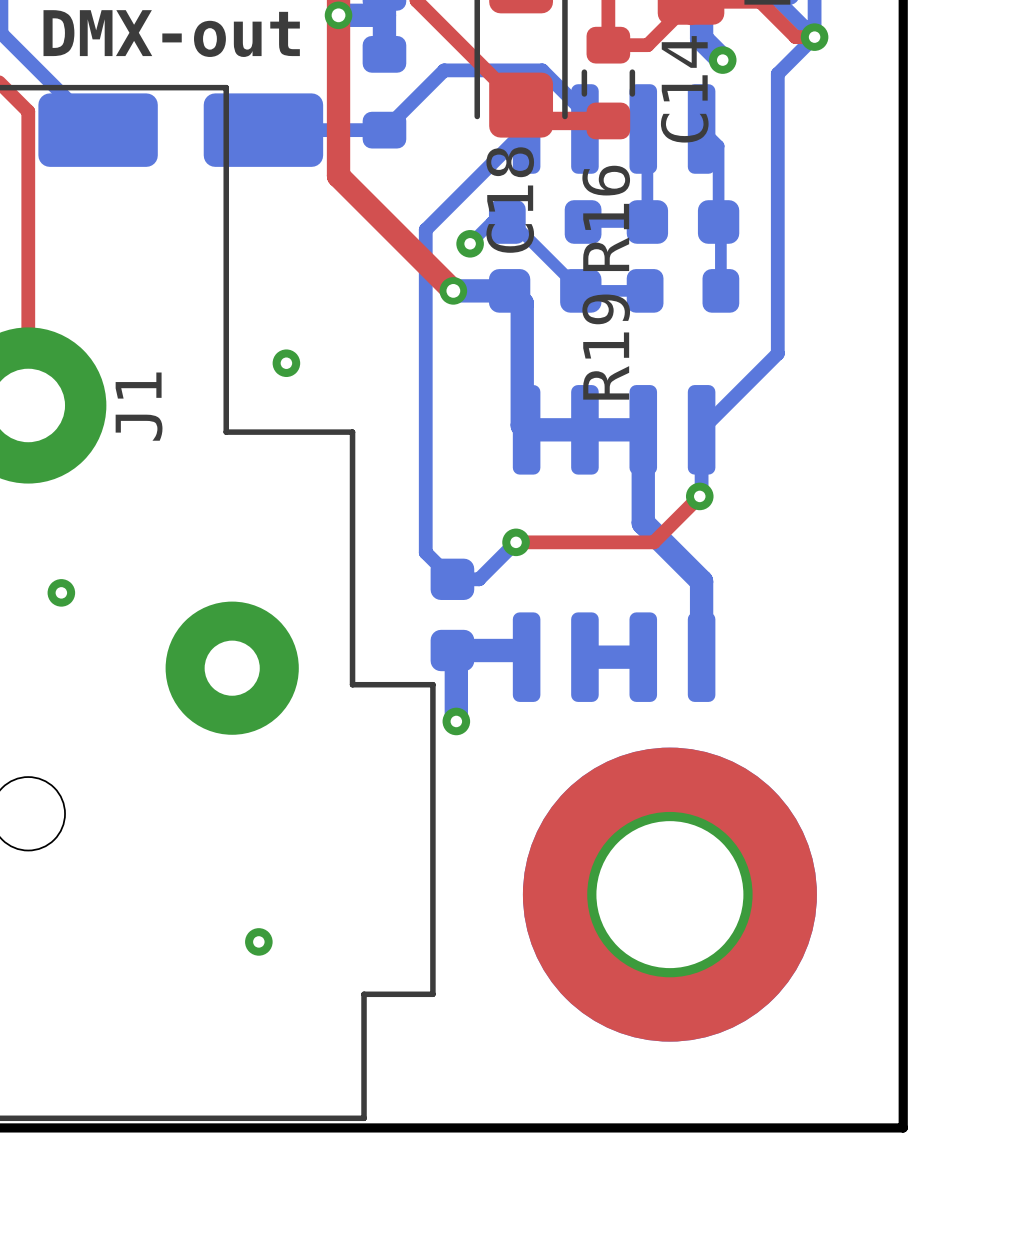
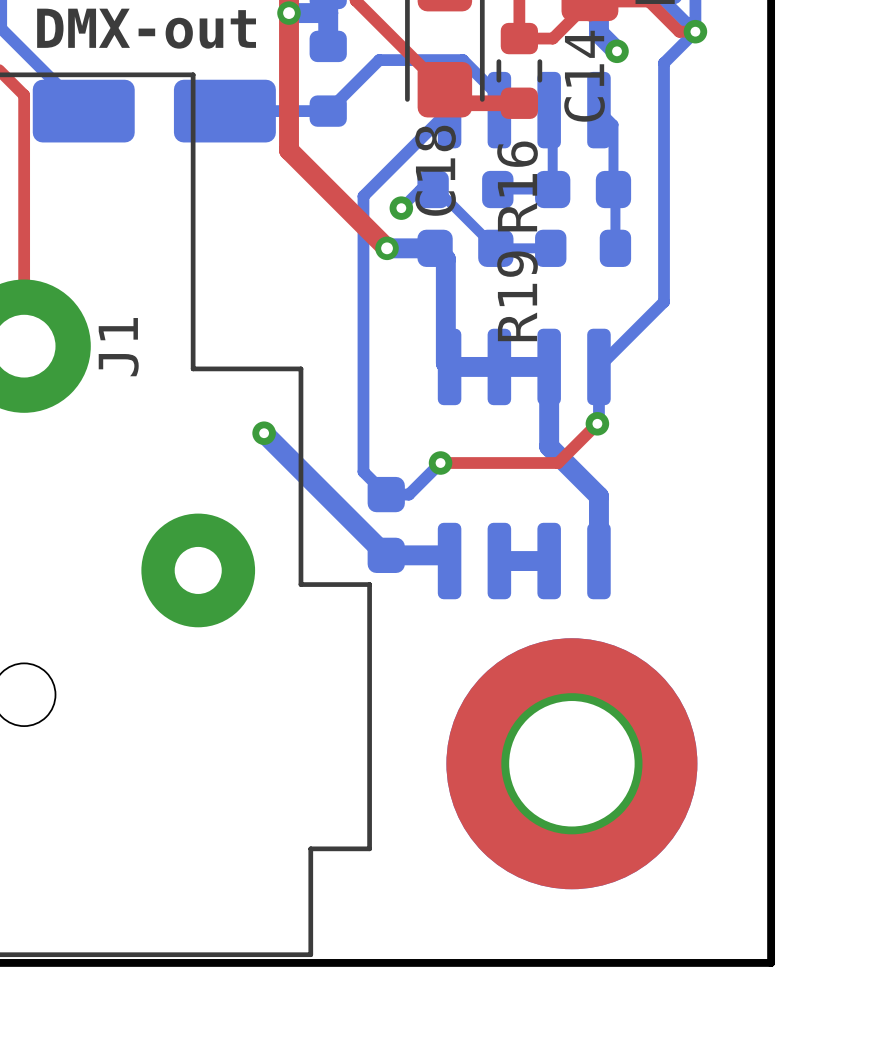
via: (286, 363) -> none
via: none -> (264, 433)
via: (61, 592) -> none
bottom track: (452, 650) (456, 654) (456, 721) -> (386, 555) (264, 433)
via: (456, 721) -> none
via: (258, 941) -> none

